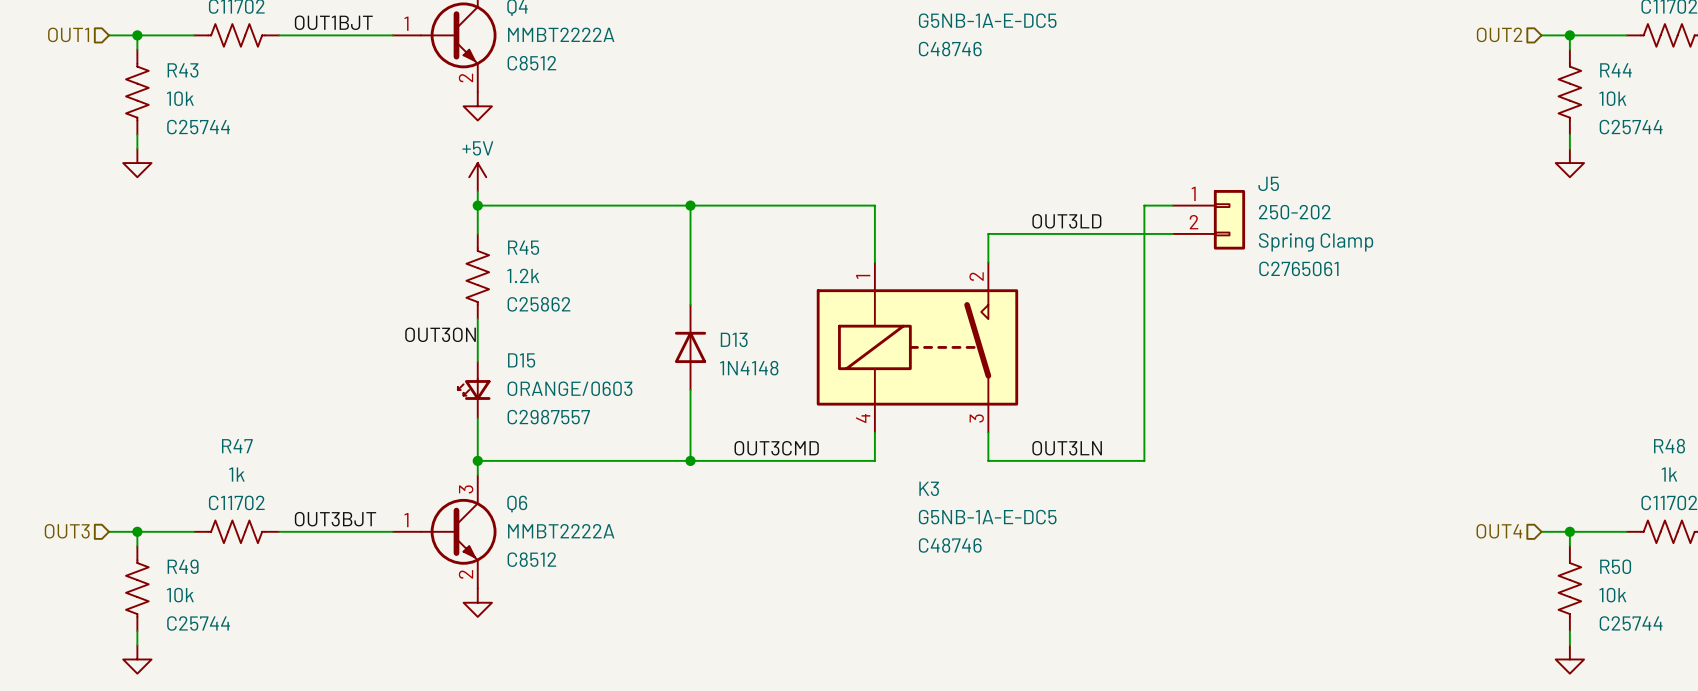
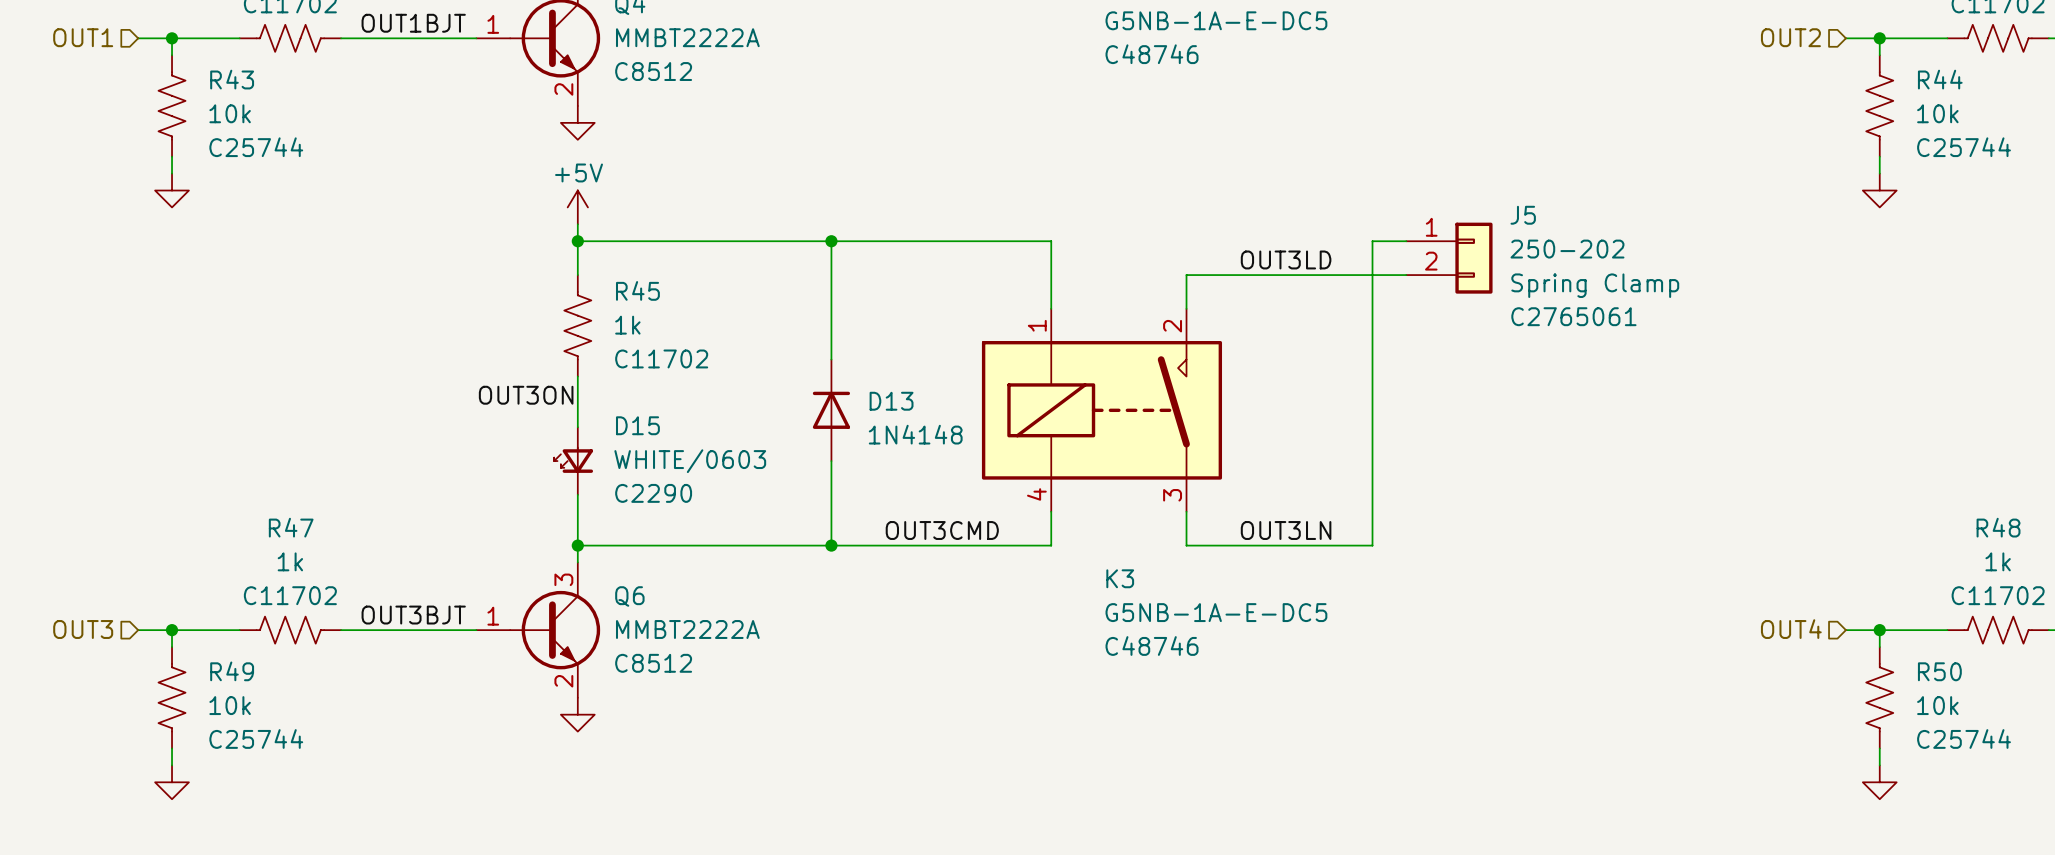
R45 value: 1.2k (523, 275) -> 1k (627, 325)
R45 text: C25862 (538, 304) -> C11702 (661, 358)
D15 value: ORANGE/0603 (569, 388) -> WHITE/0603 (690, 461)
D15 text: C2987557 (548, 417) -> C2290 (653, 493)

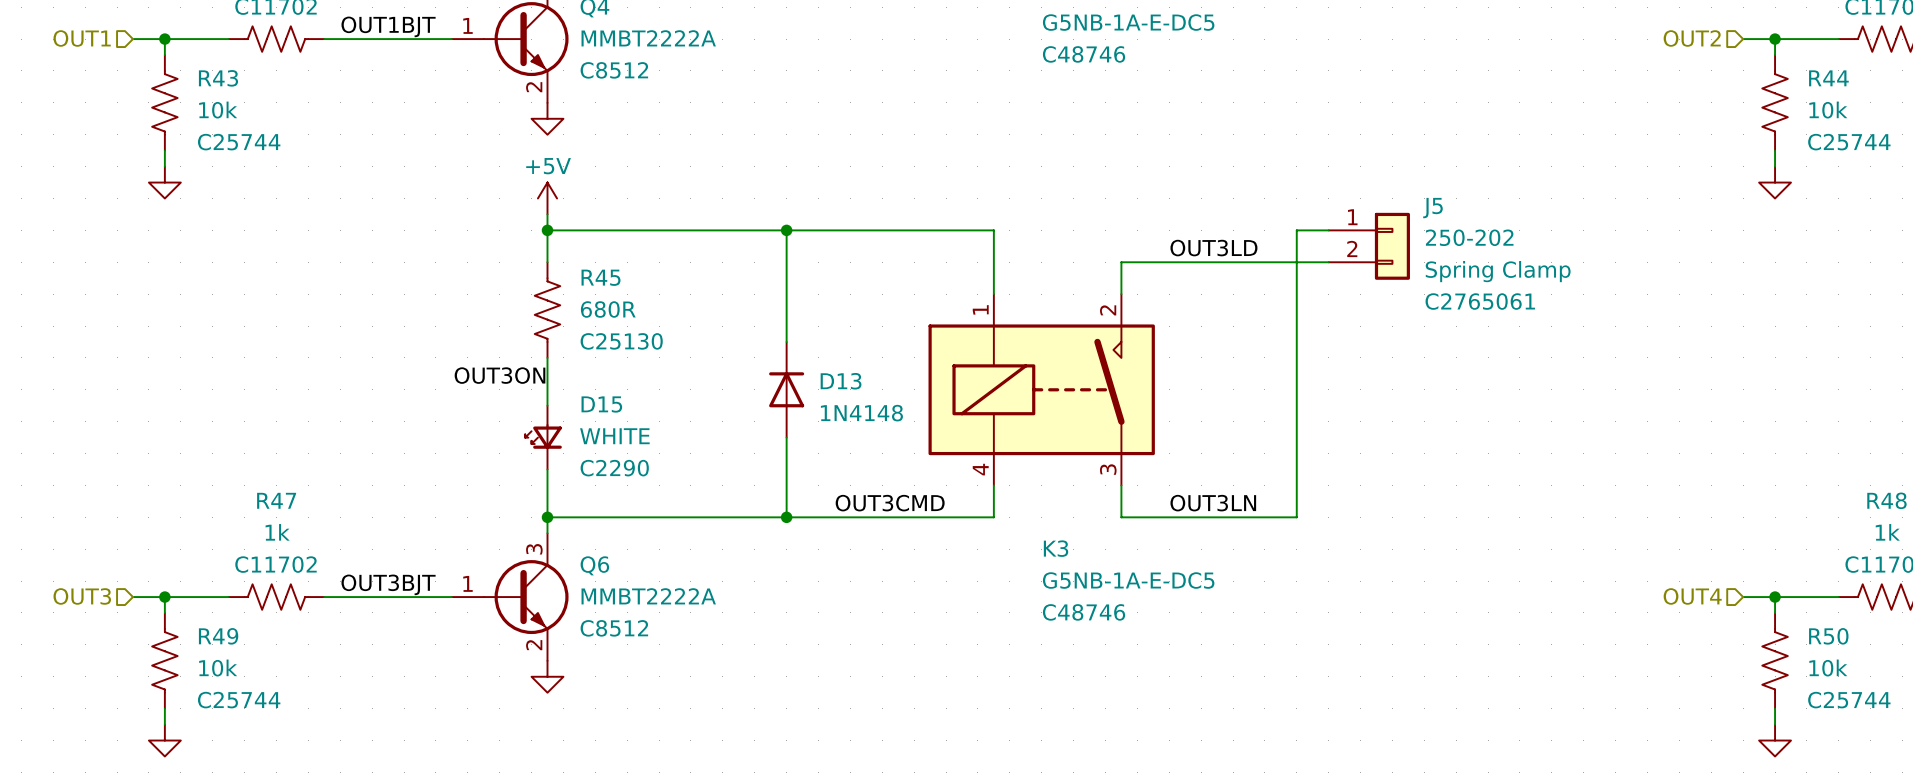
R45 value: 1k (627, 325) -> 680R (608, 309)
R45 text: C11702 (661, 358) -> C25130 (621, 341)
D15 value: WHITE/0603 (690, 461) -> WHITE (614, 436)

